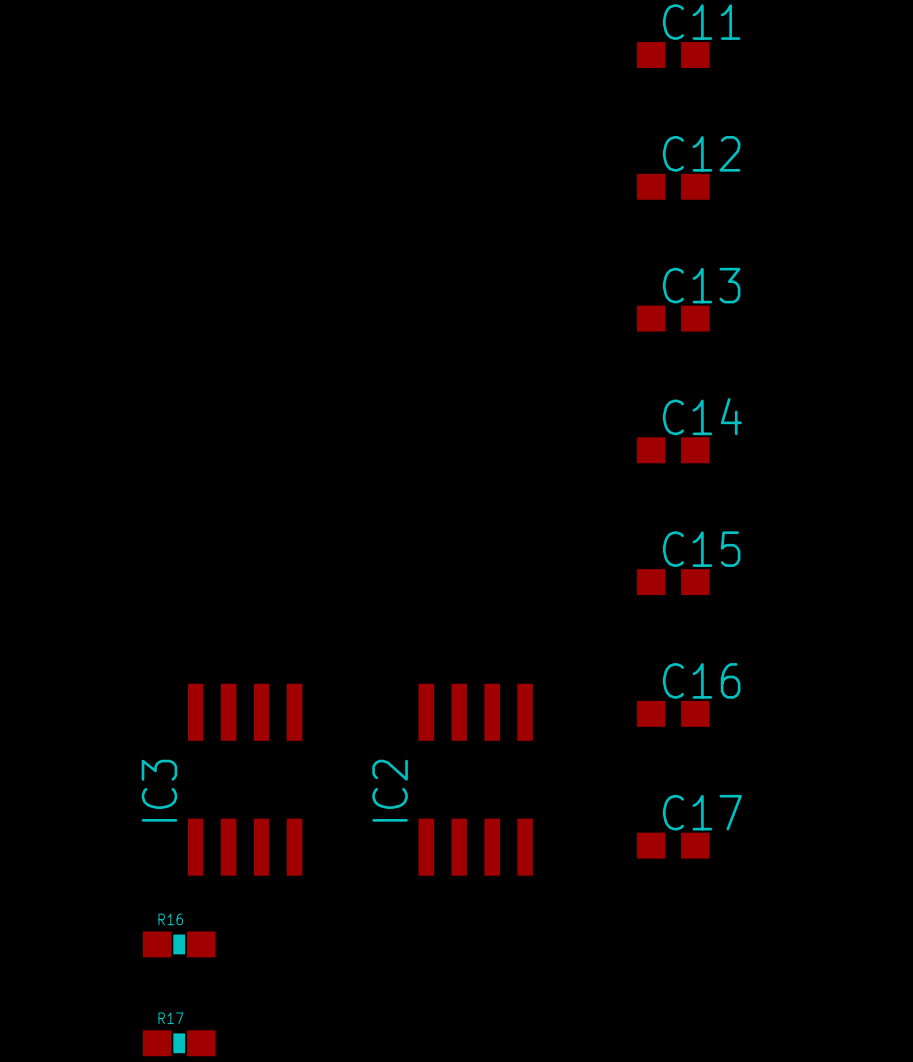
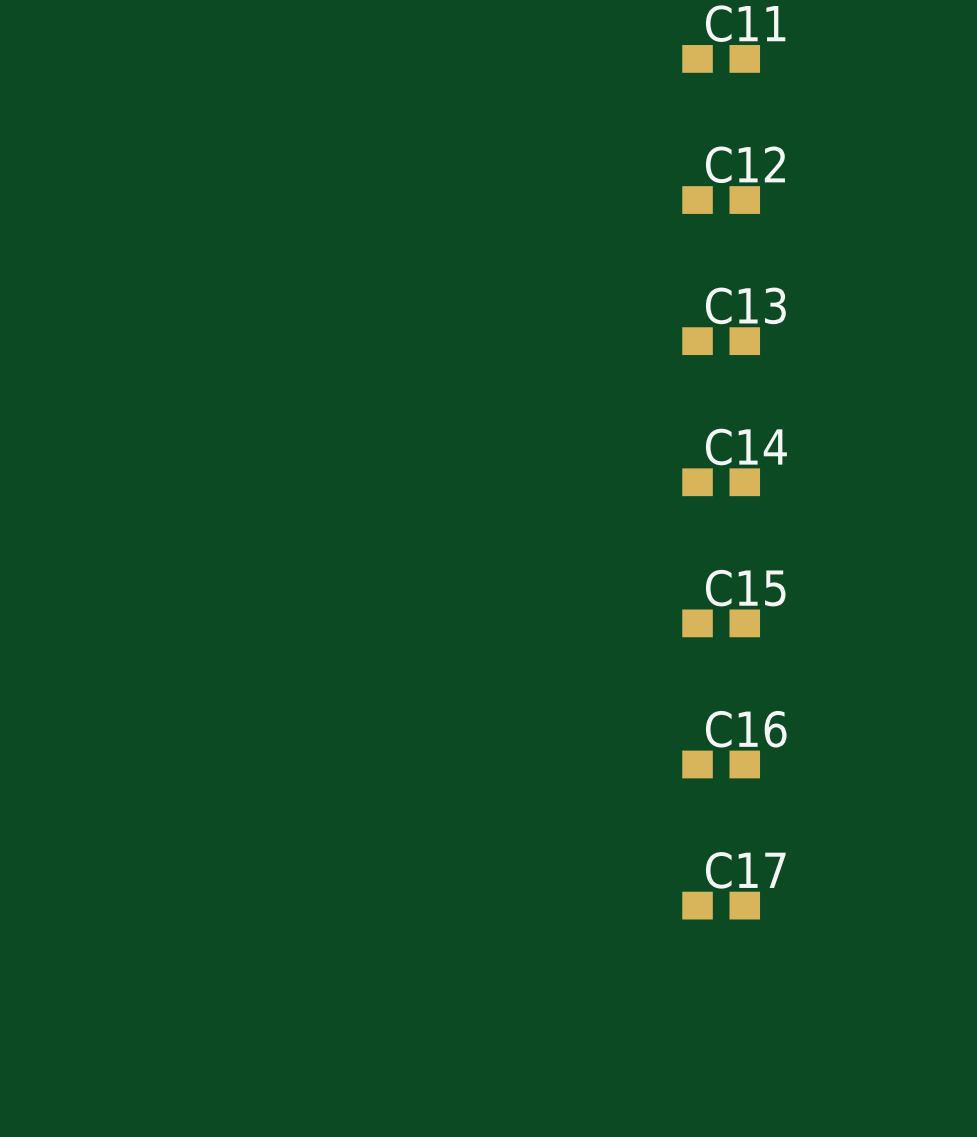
IC3: (245, 779) -> none
IC2: (475, 779) -> none
R16: (179, 944) -> none
R17: (179, 1043) -> none

